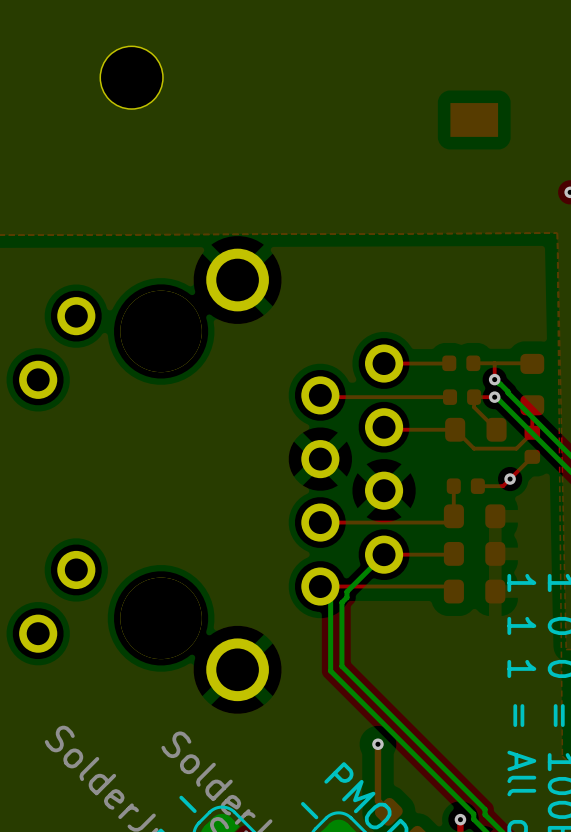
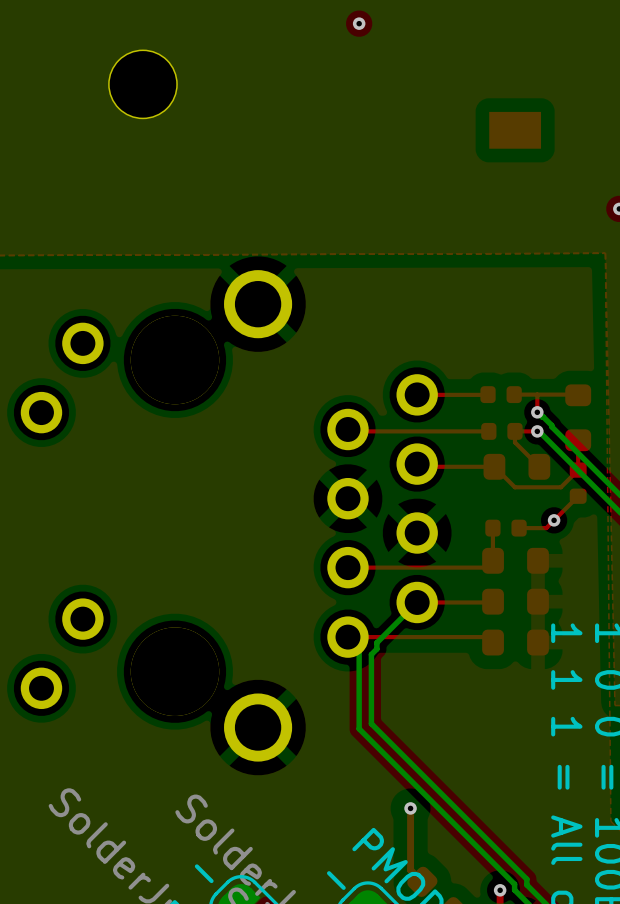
via: none -> (359, 23)

